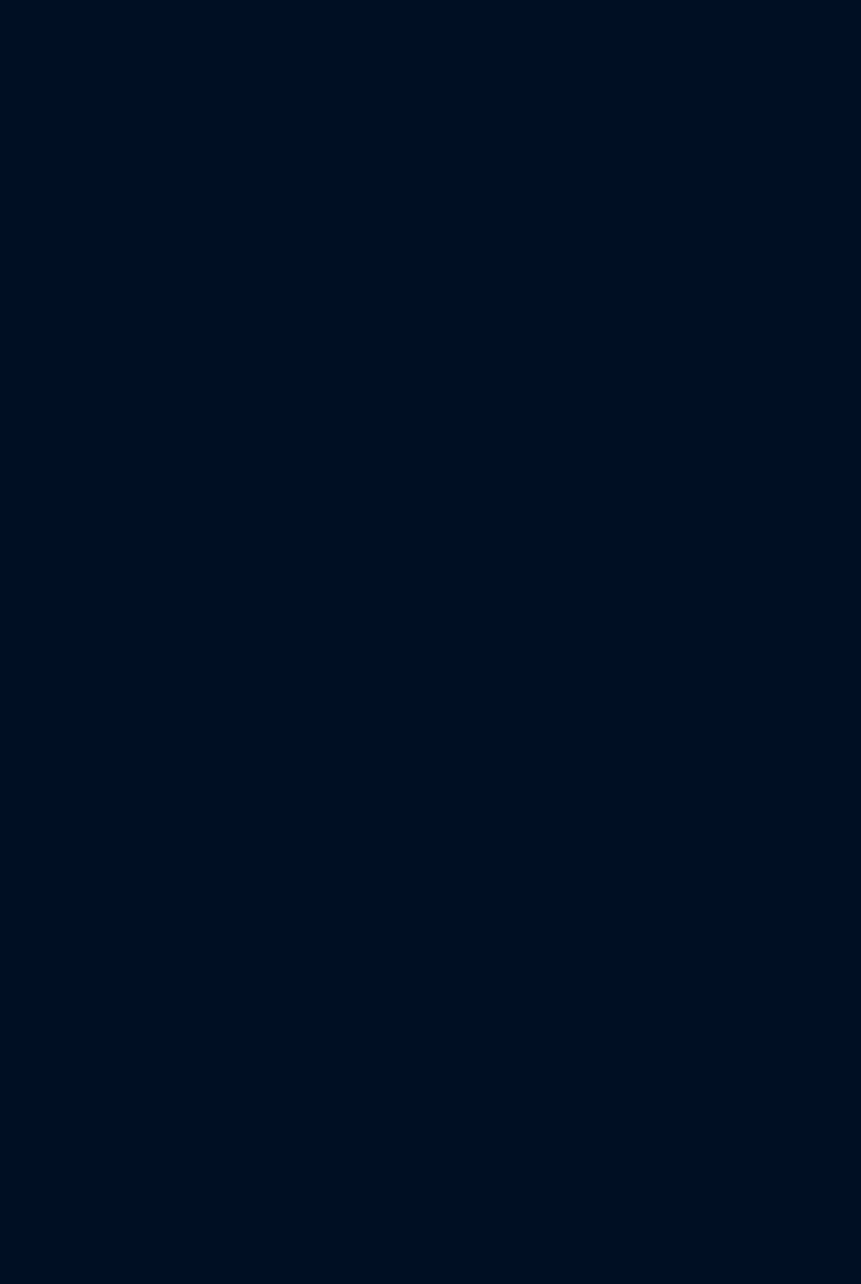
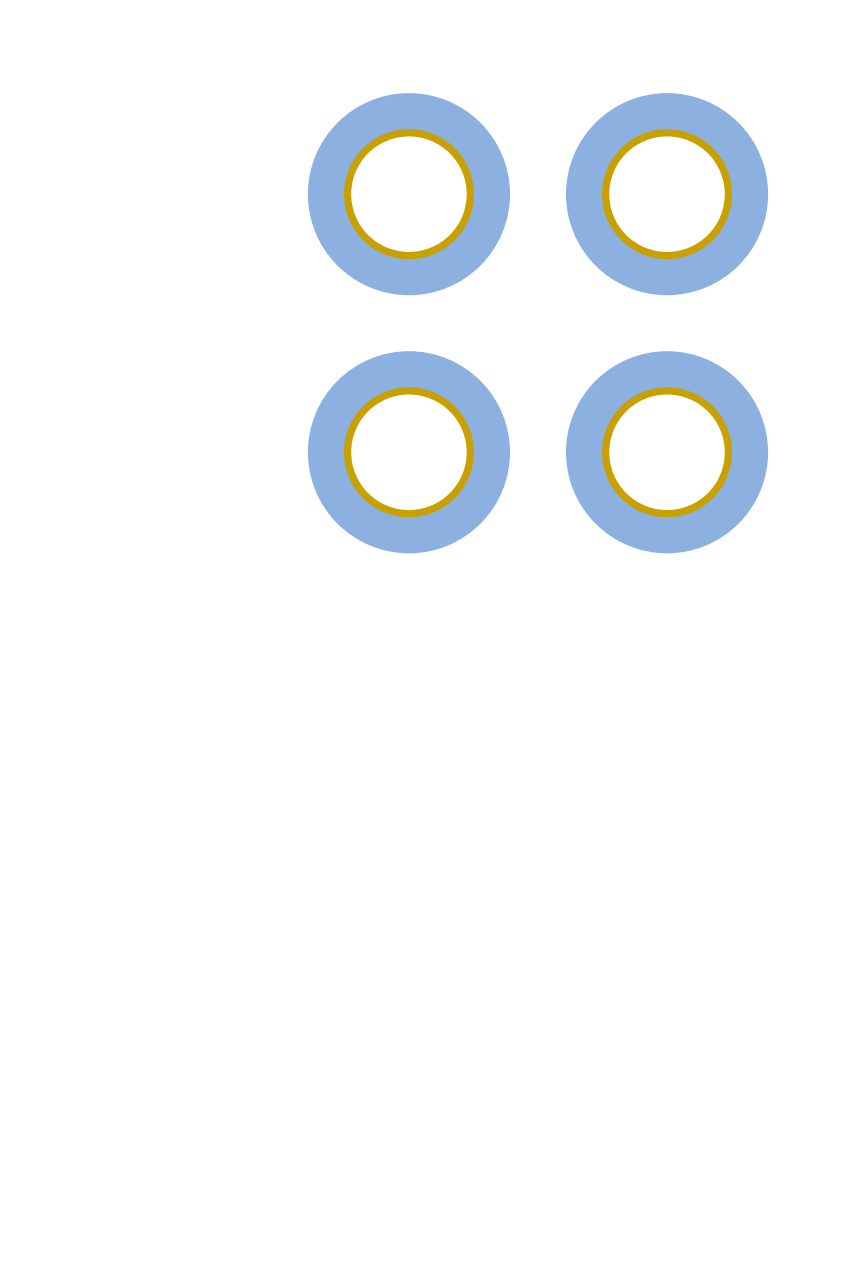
part: none -> (408, 194)
part: none -> (667, 194)
part: none -> (408, 452)
part: none -> (667, 452)

